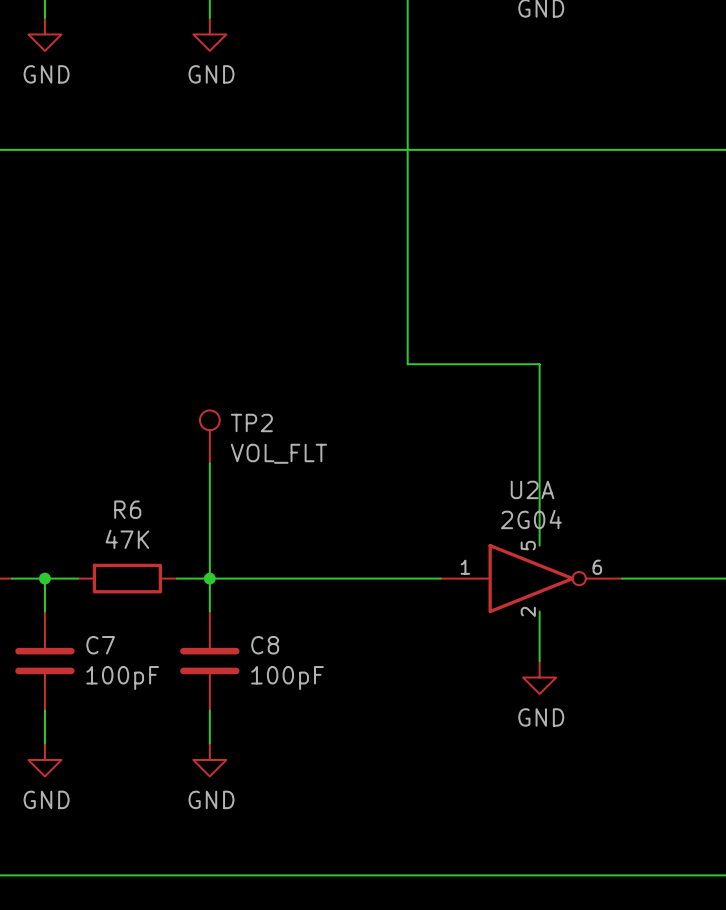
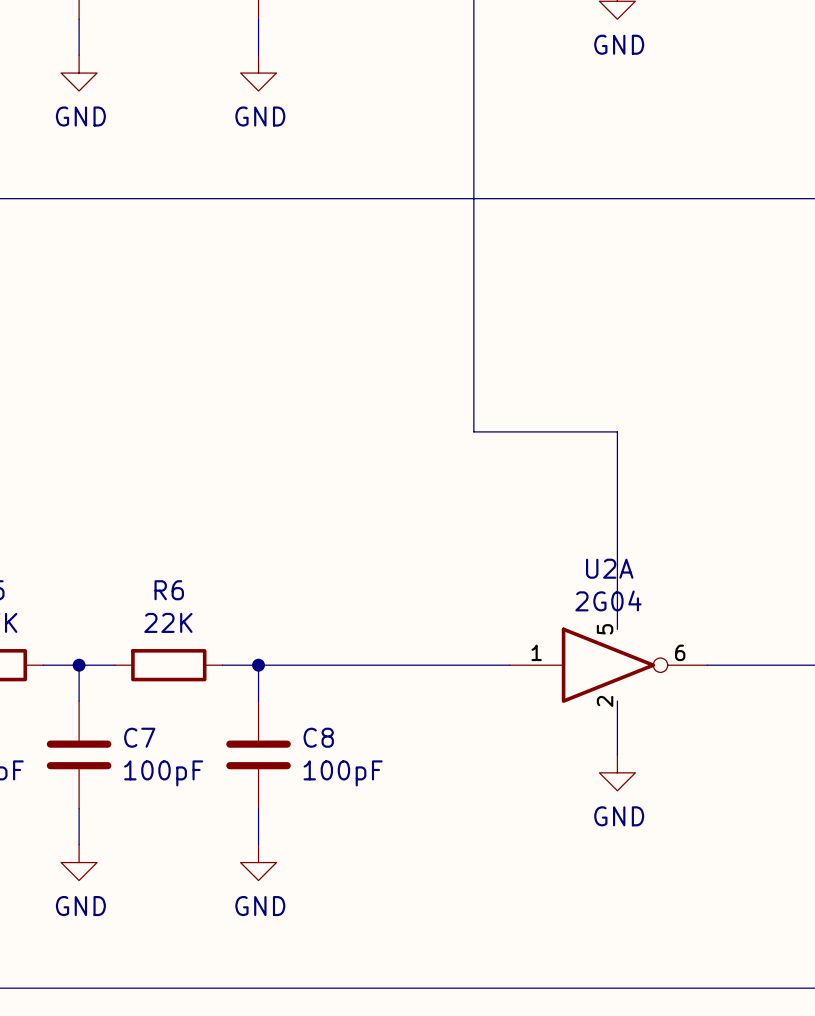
TP2: VOL_FLT (209, 436) -> none
wire: (209, 463) (209, 578) -> none
R6 value: 47K (127, 539) -> 22K (168, 622)

